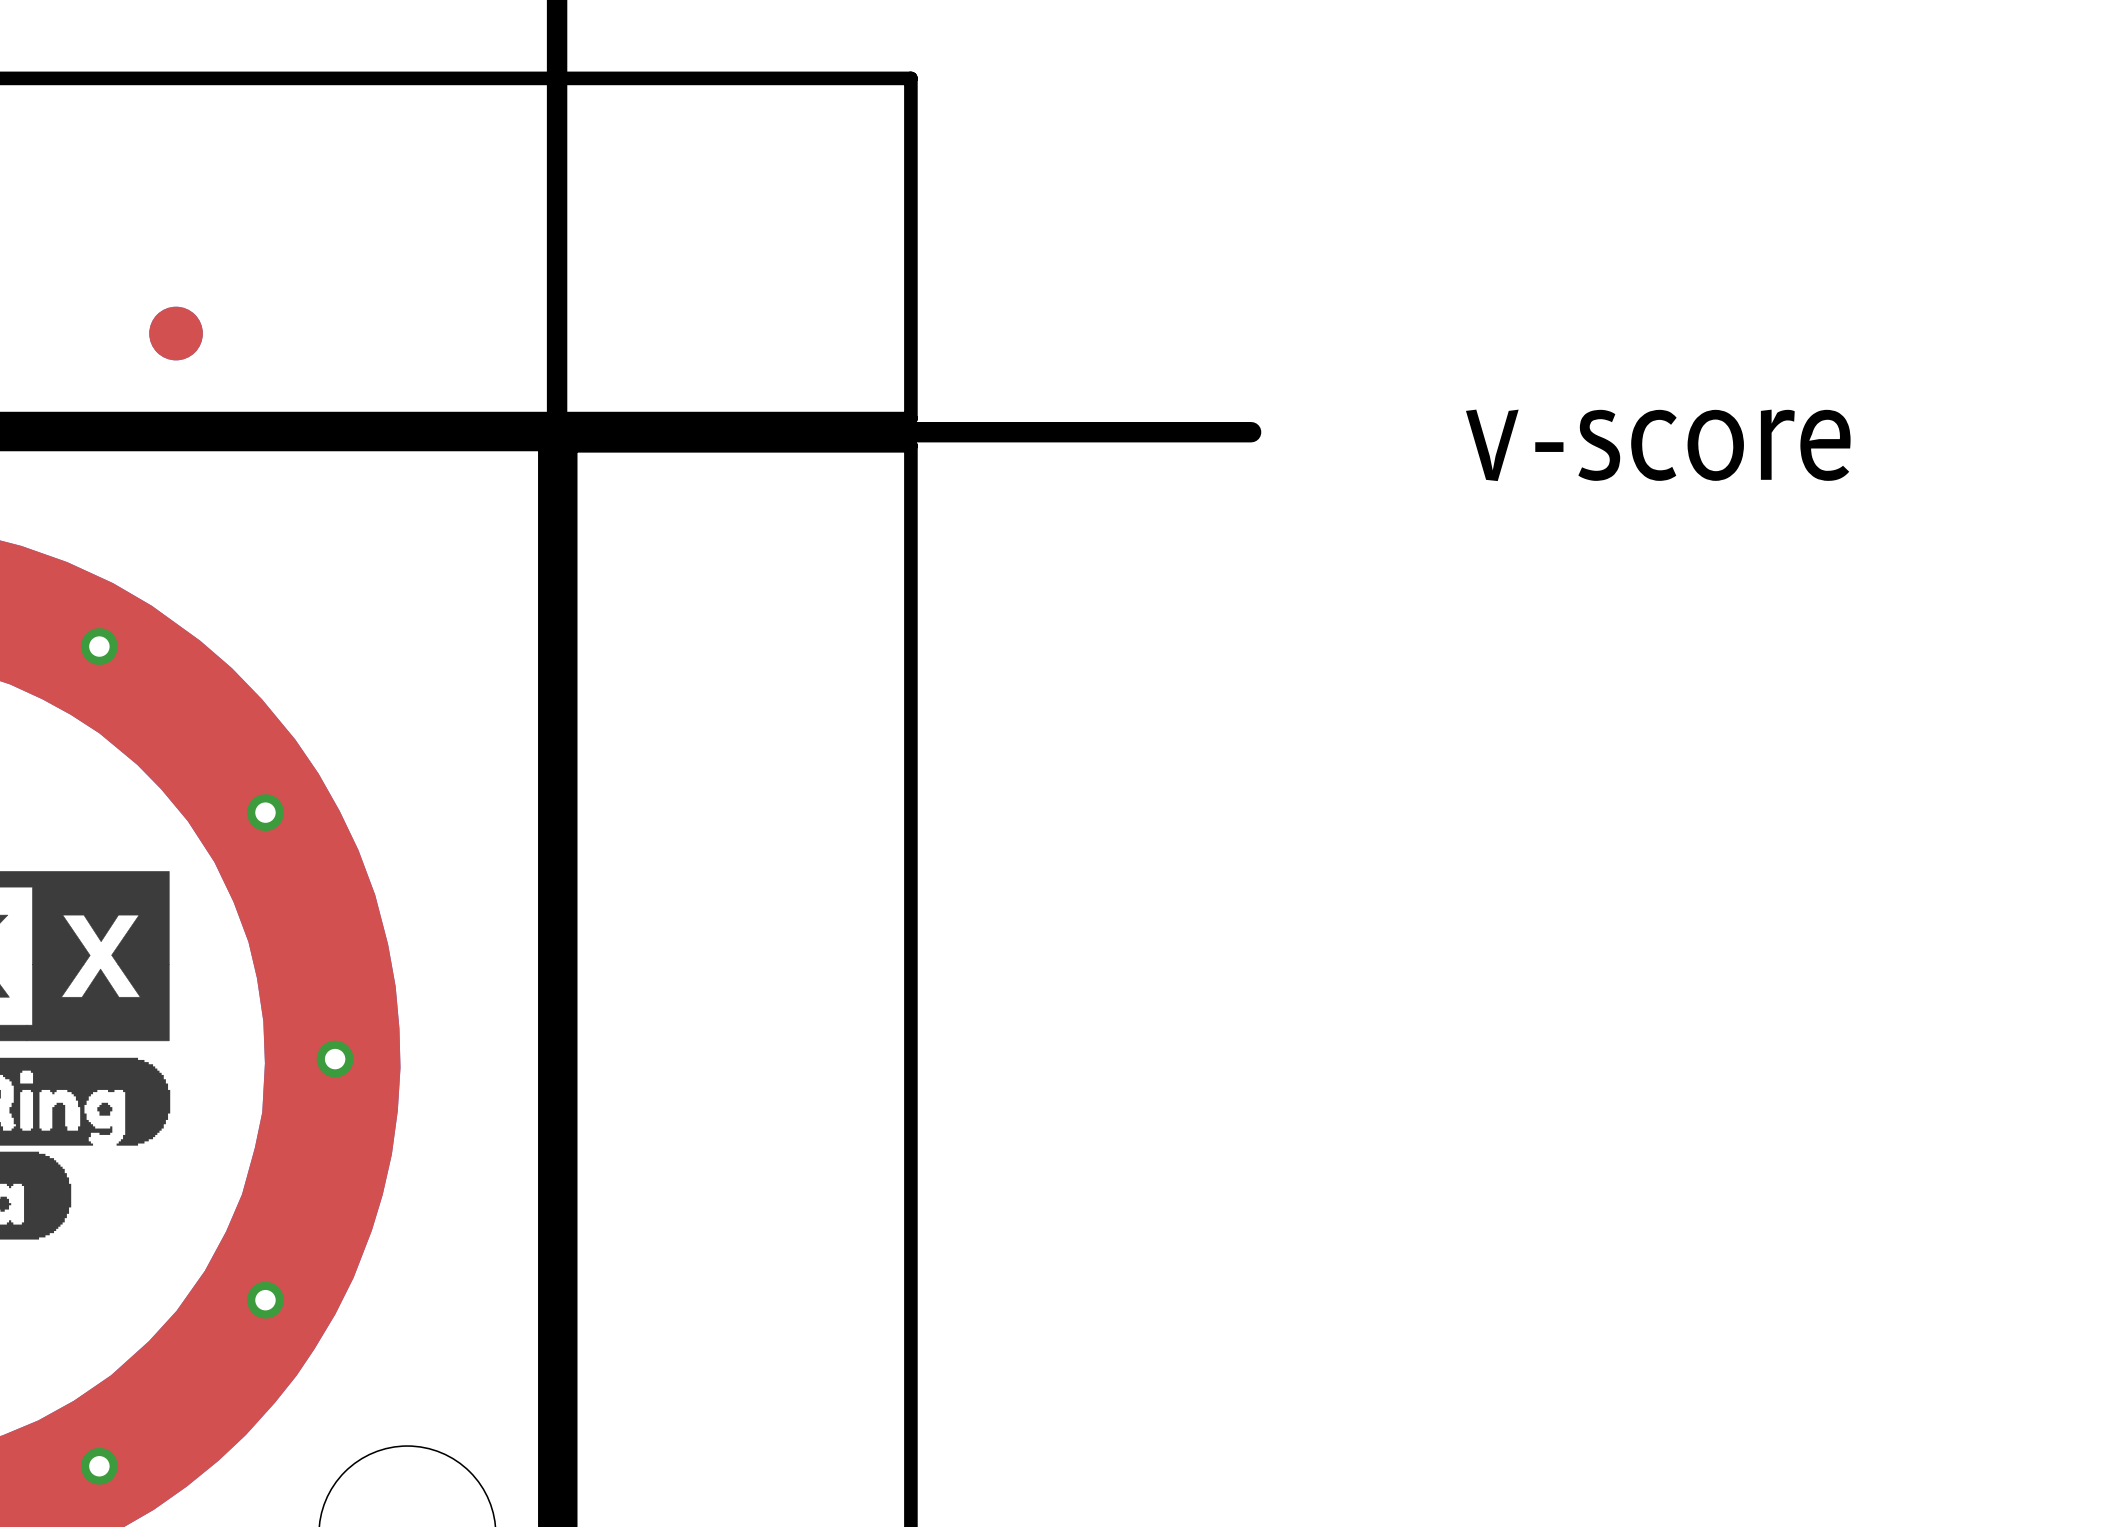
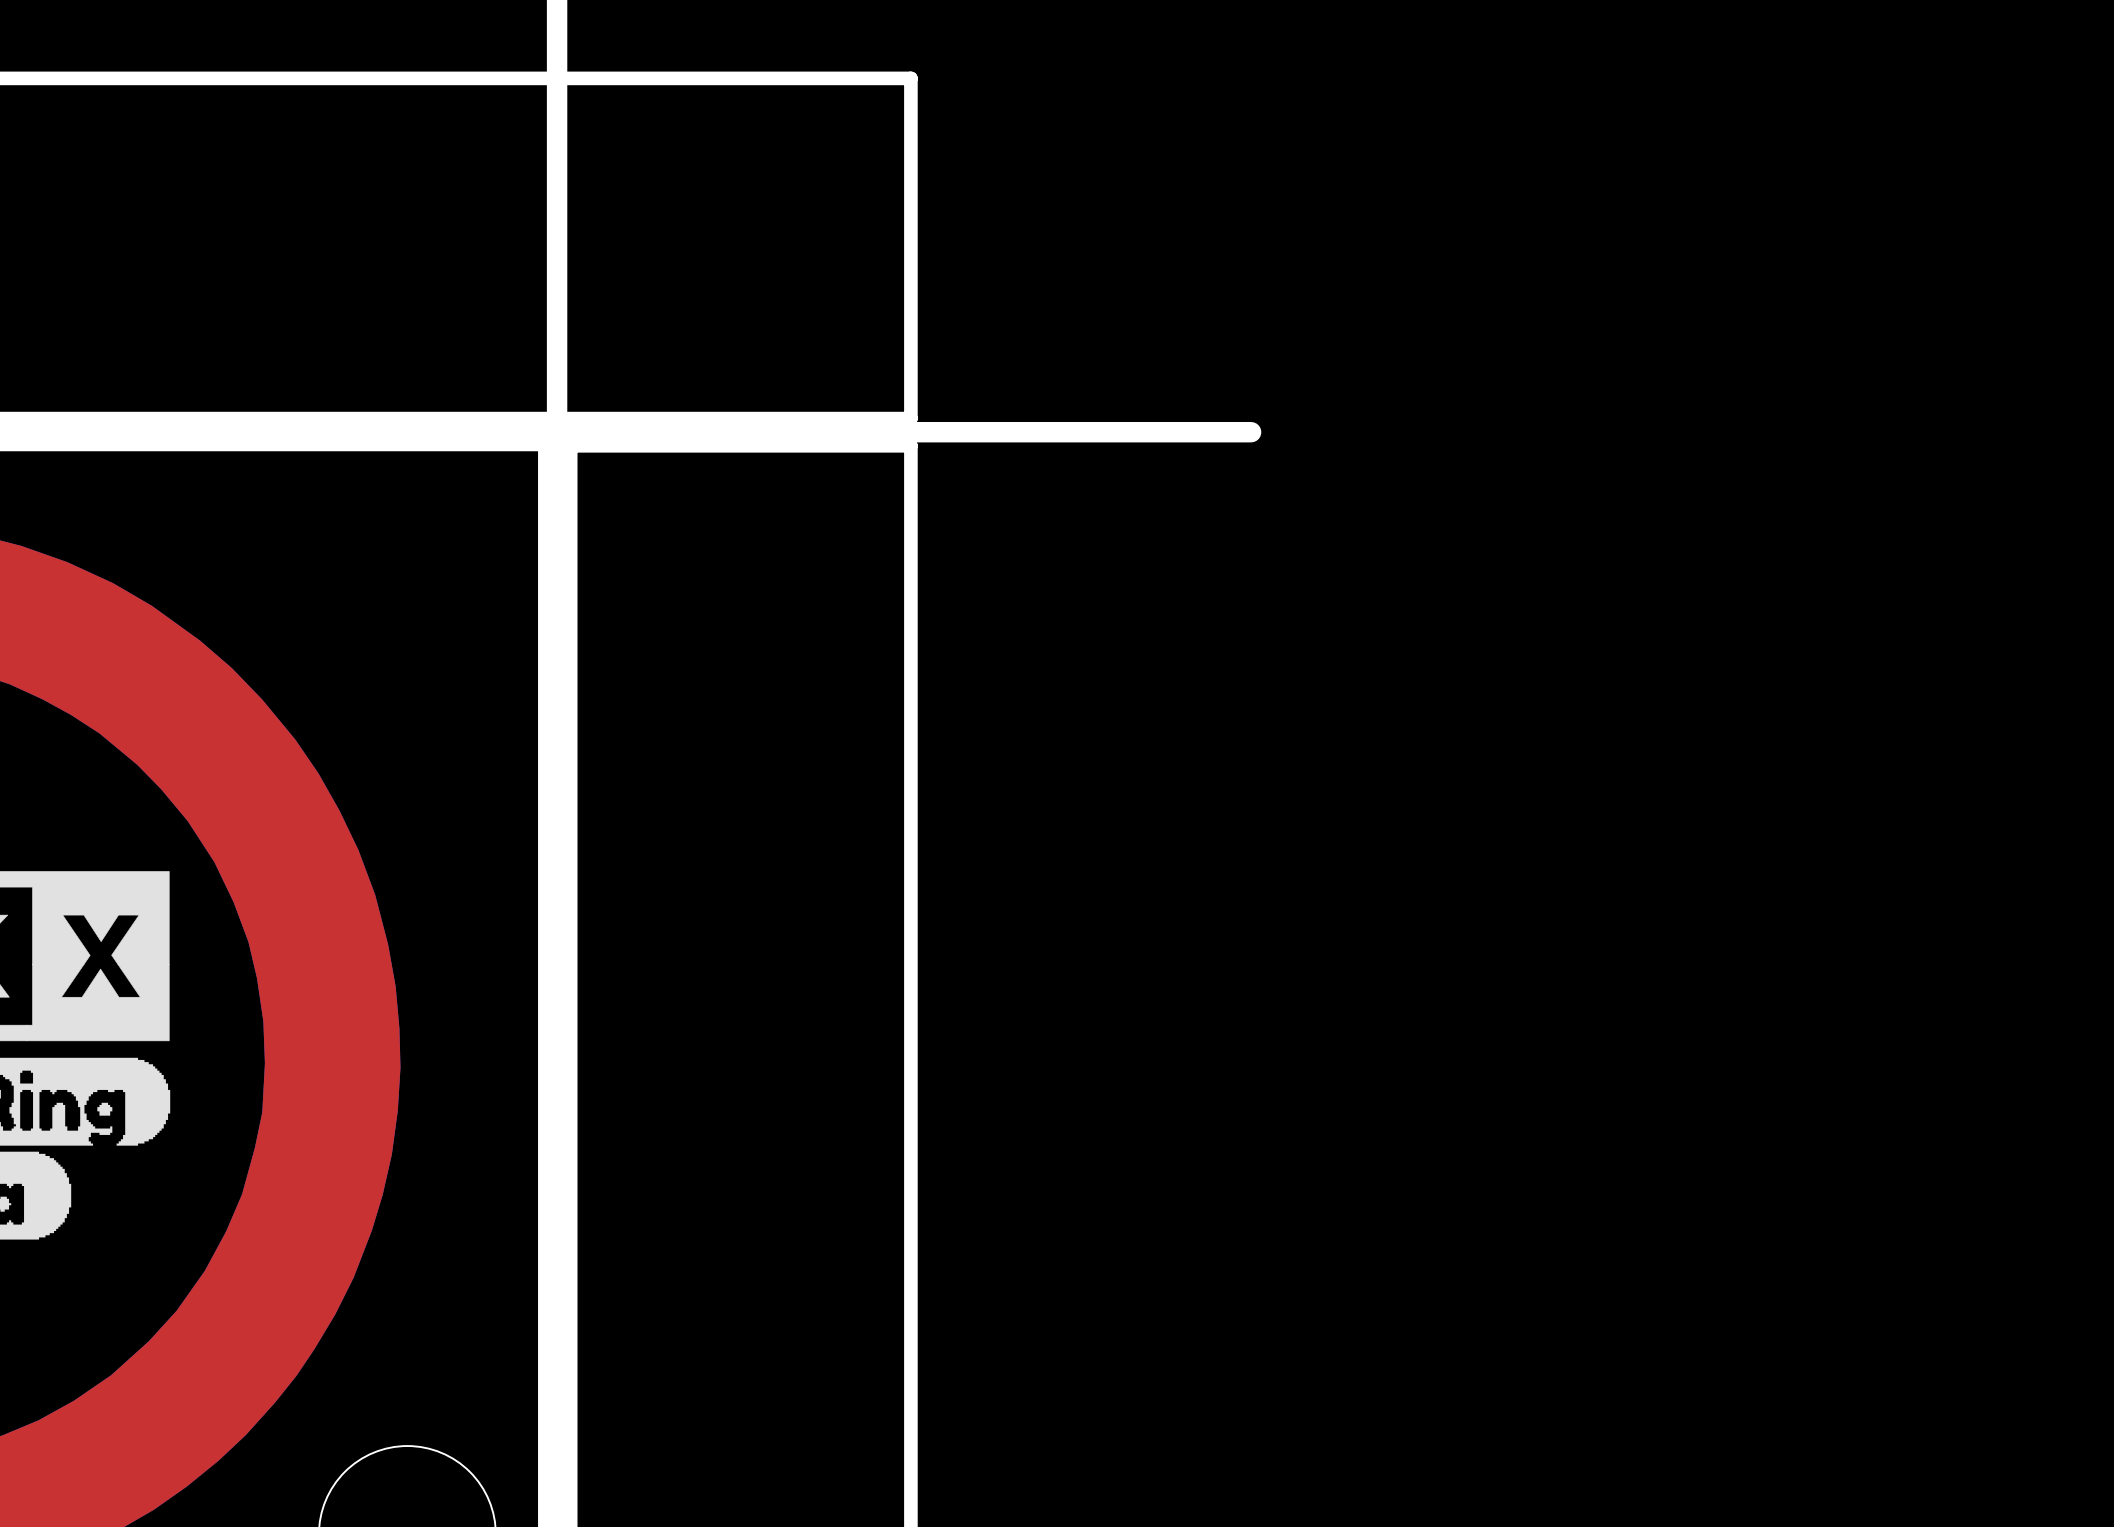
part: (176, 333) -> none
text: v-score (1658, 445) -> none
via: (99, 646) -> none
via: (265, 812) -> none
via: (335, 1059) -> none
via: (265, 1300) -> none
via: (99, 1466) -> none

